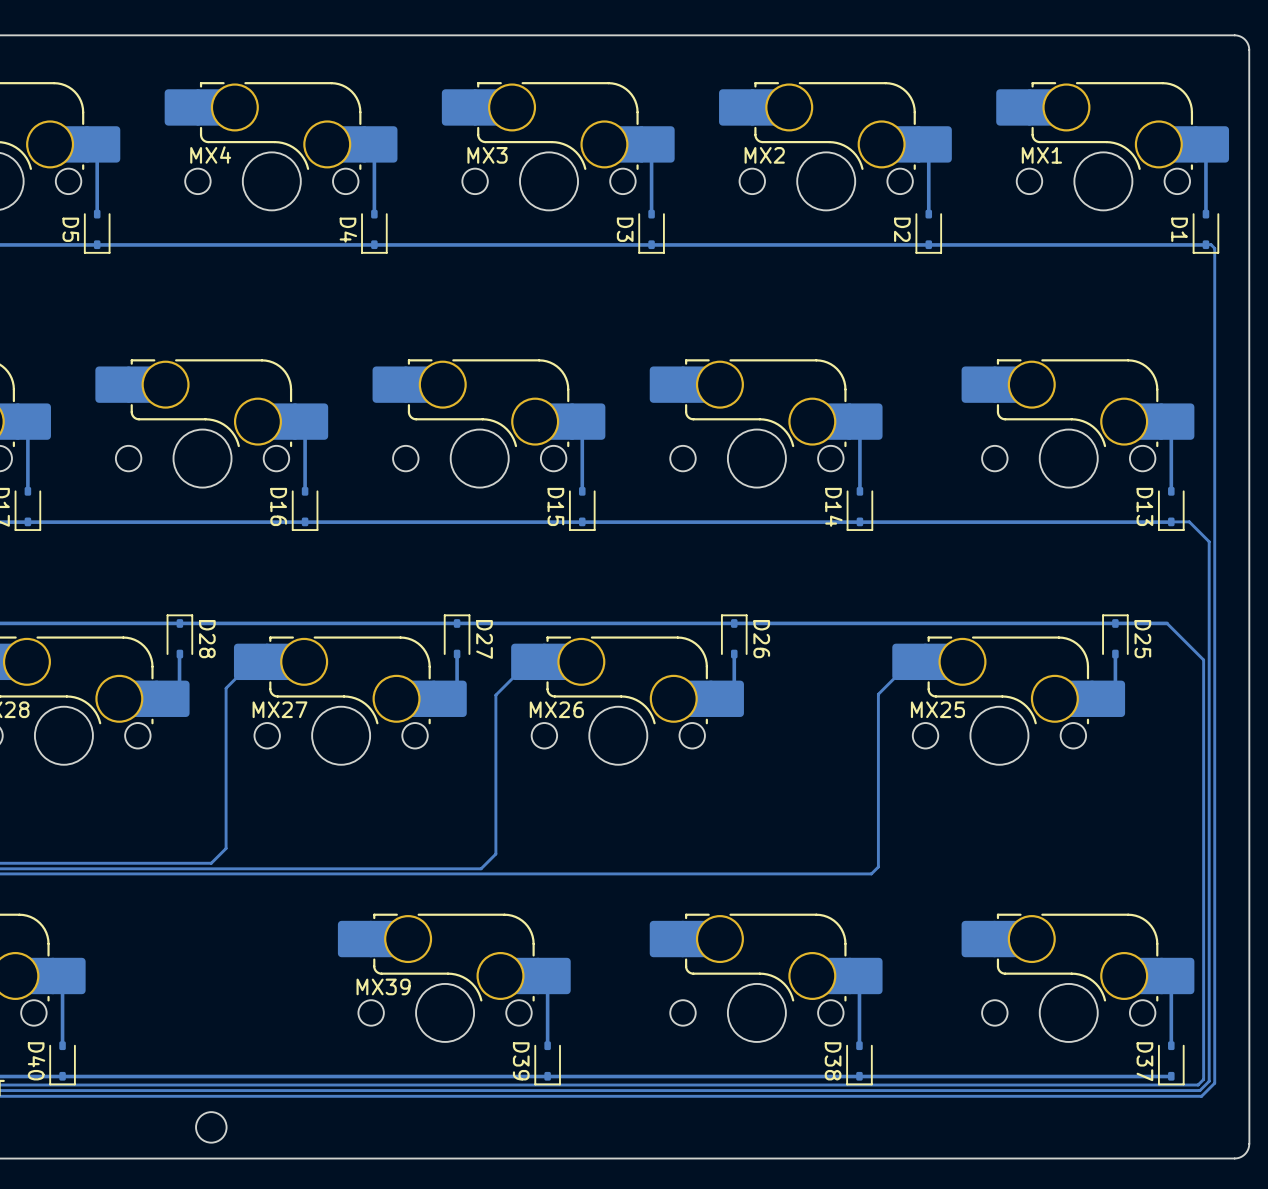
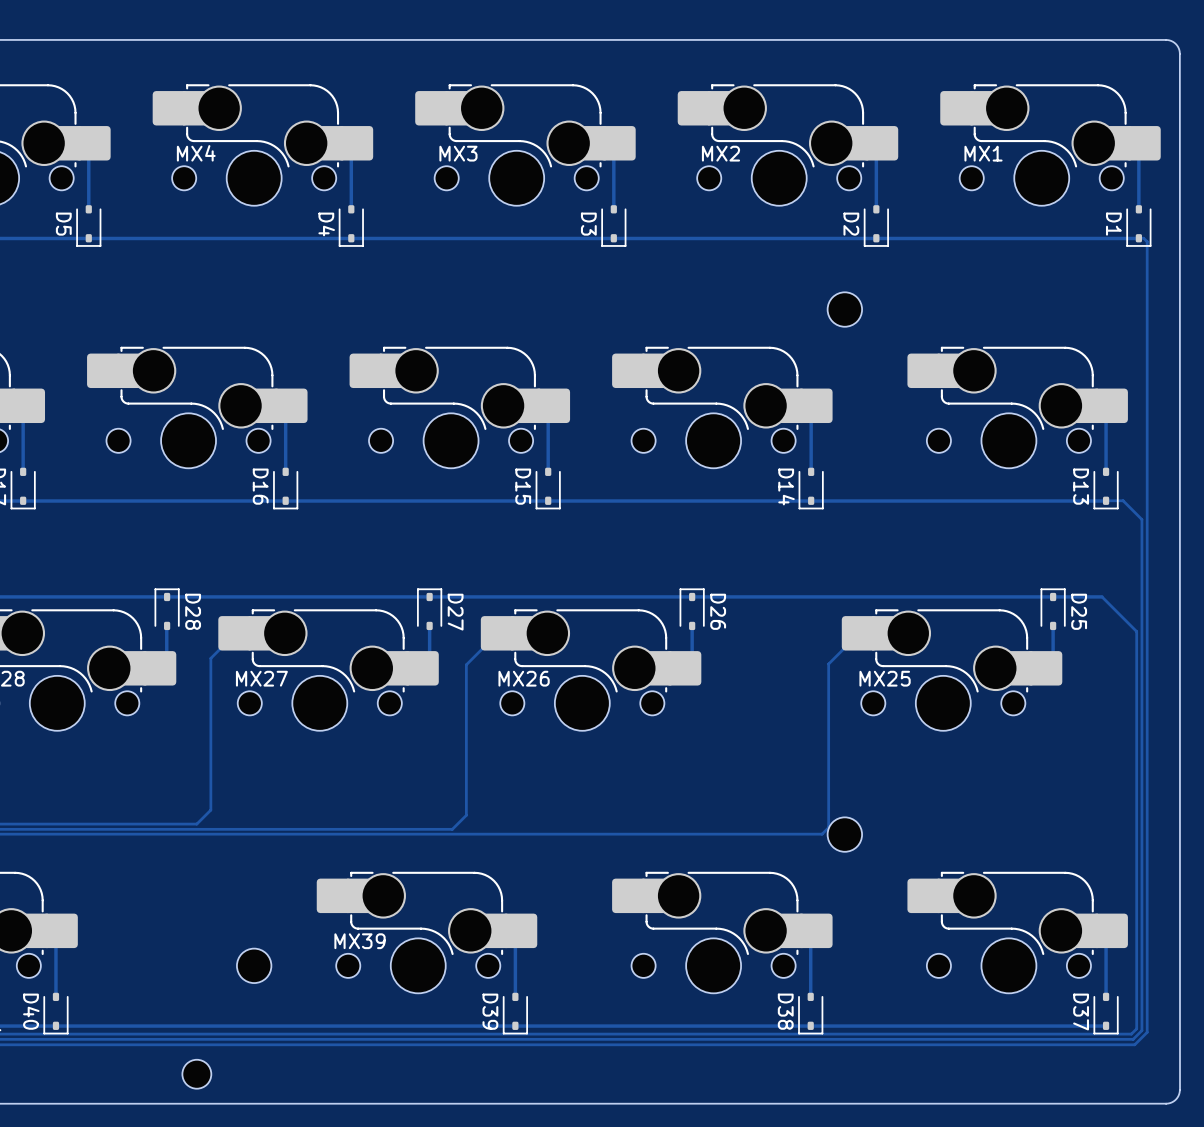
part: none -> (844, 309)
part: none -> (844, 834)
part: none -> (254, 965)

